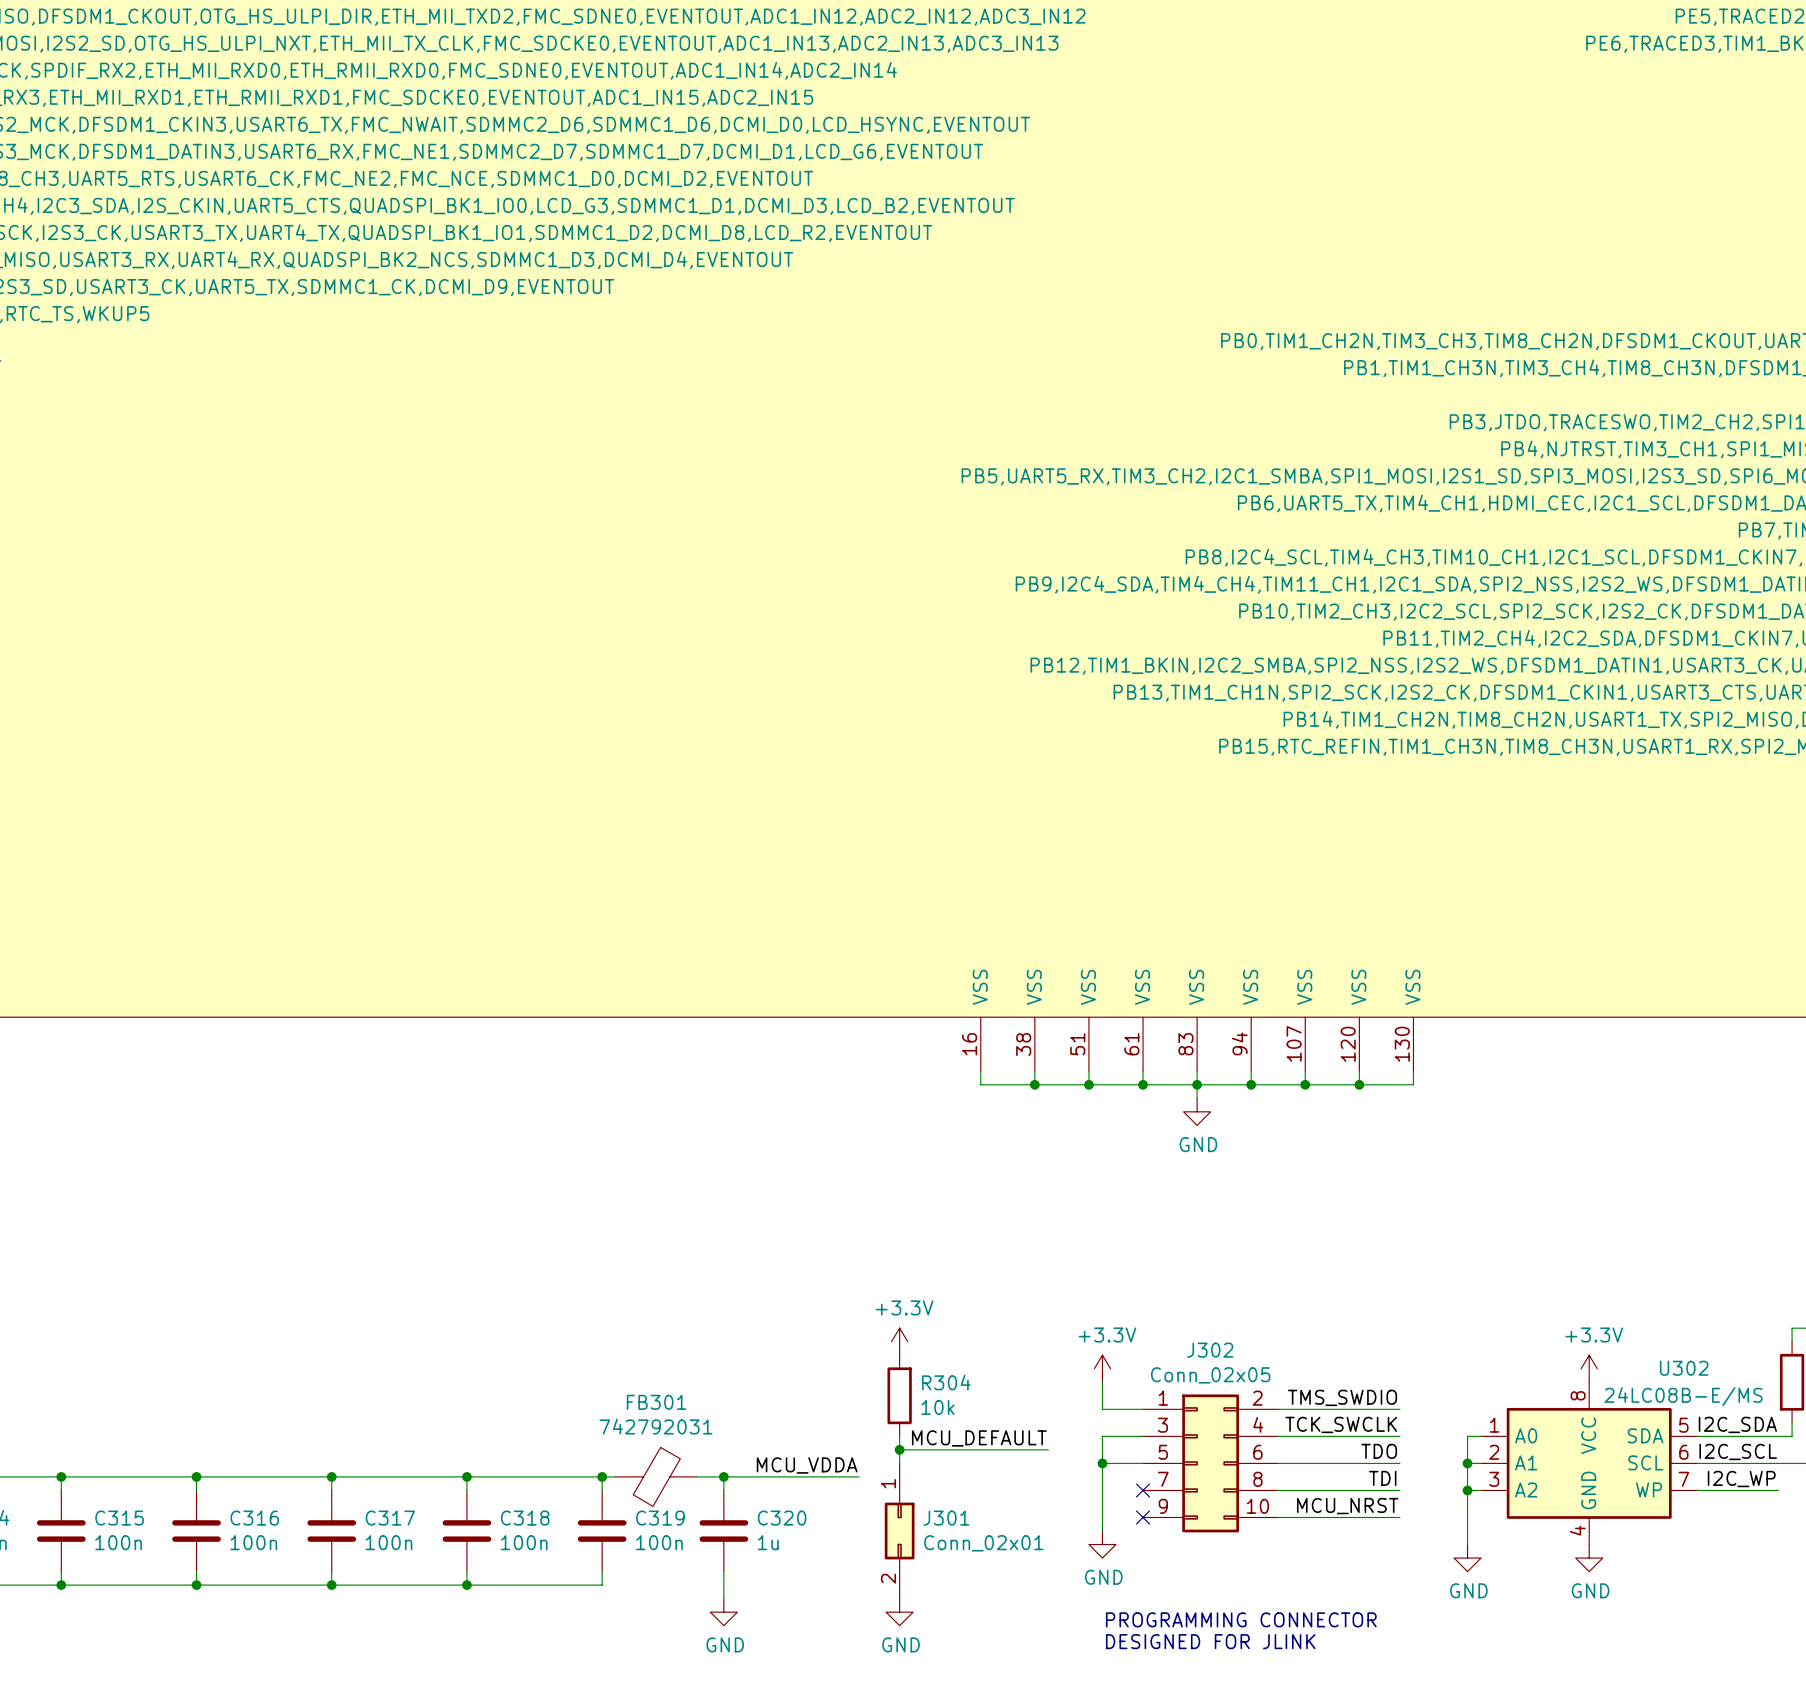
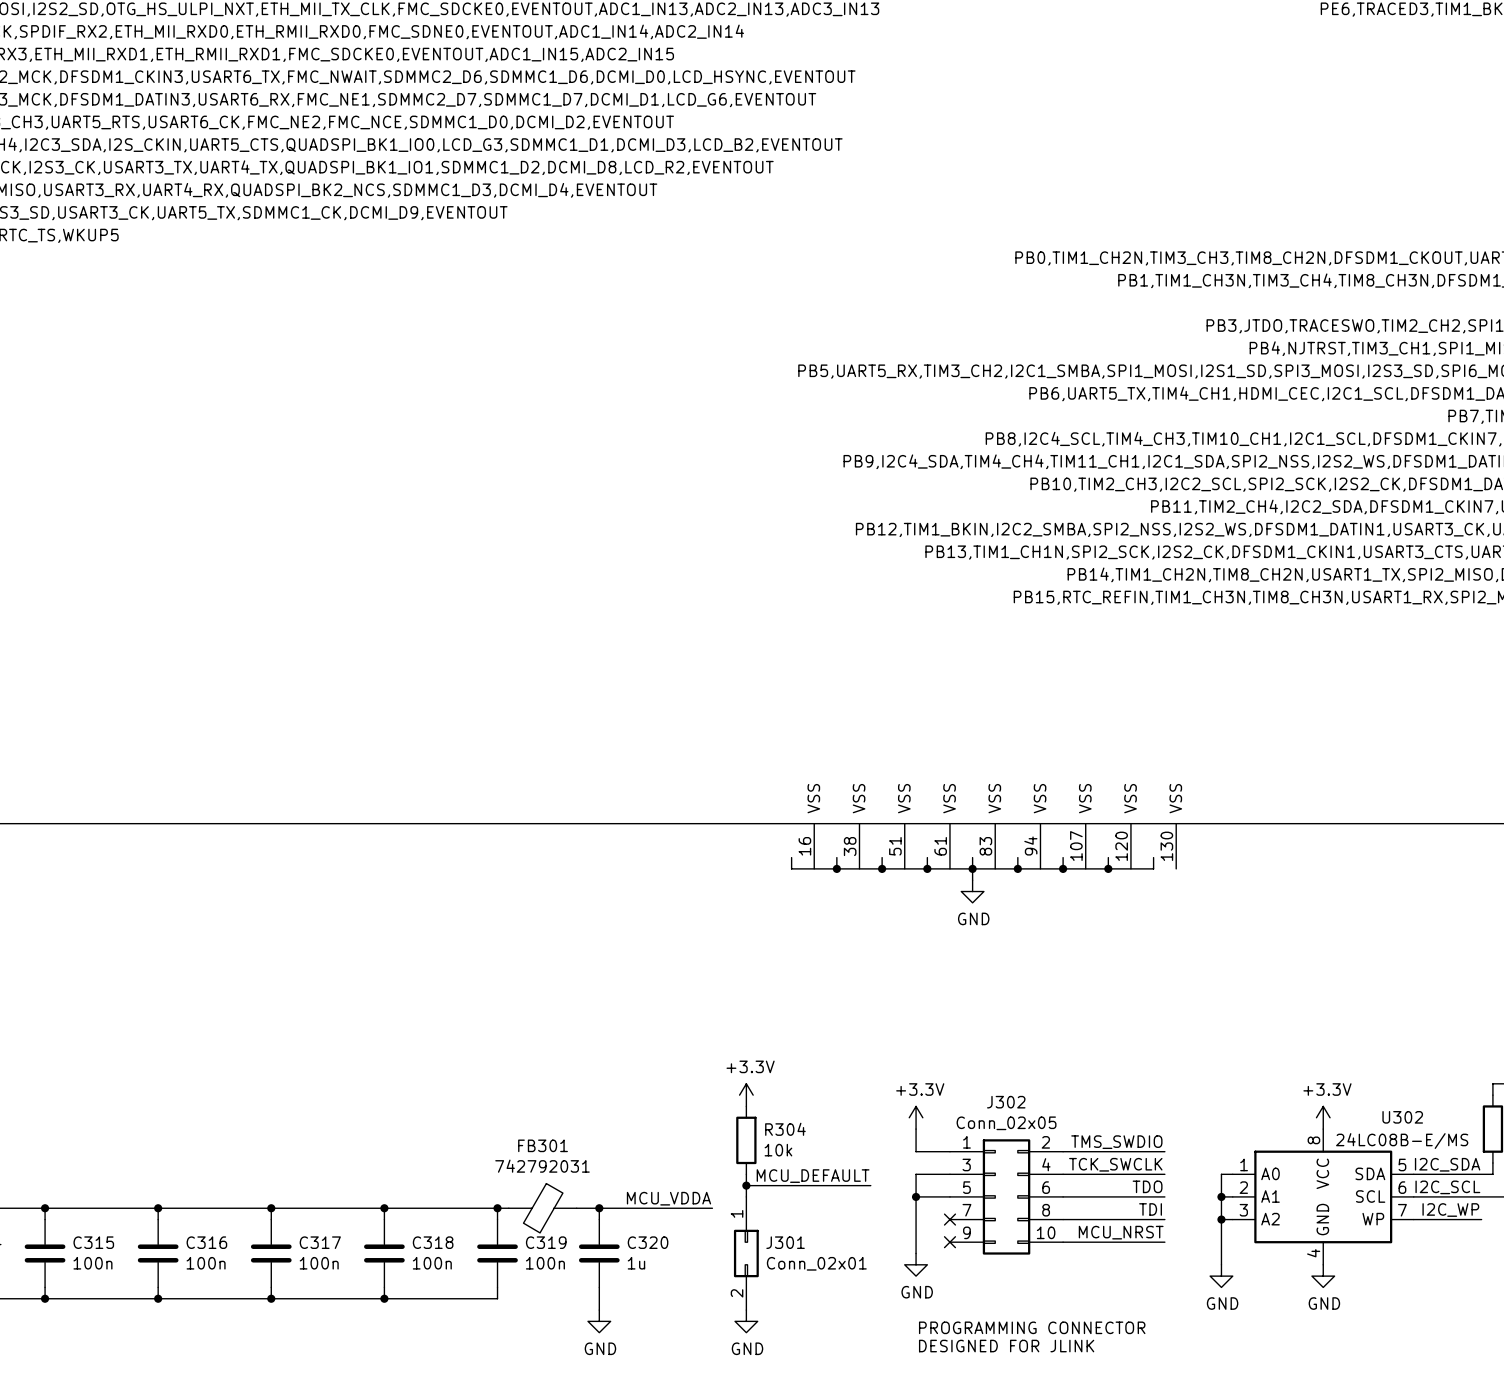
wire: (980, 1071) (980, 1084) (1413, 1084) (1413, 1071) -> (791, 857) (791, 868) (1153, 868) (1153, 857)
junction: none -> (836, 868)
wire: (1034, 1071) (1034, 1084) -> (836, 857) (836, 868)
junction: none -> (882, 868)
wire: (1088, 1071) (1088, 1084) -> (882, 857) (882, 868)
junction: none -> (927, 868)
wire: (1143, 1071) (1143, 1084) -> (927, 857) (927, 868)
junction: none -> (972, 868)
wire: (1197, 1071) (1197, 1098) -> (972, 857) (972, 880)
junction: none -> (1017, 868)
wire: (1251, 1071) (1251, 1084) -> (1017, 857) (1017, 868)
junction: none -> (1063, 868)
wire: (1305, 1071) (1305, 1084) -> (1063, 857) (1063, 868)
junction: none -> (1108, 868)
wire: (1359, 1071) (1359, 1084) -> (1108, 857) (1108, 868)
junction: (1034, 1084) -> none
junction: (1088, 1084) -> none
junction: (1143, 1084) -> none
junction: (1197, 1084) -> none
junction: (1251, 1084) -> none
junction: (1305, 1084) -> none
junction: (1359, 1084) -> none
power symbol position: GND (1197, 1111) -> GND (972, 891)

